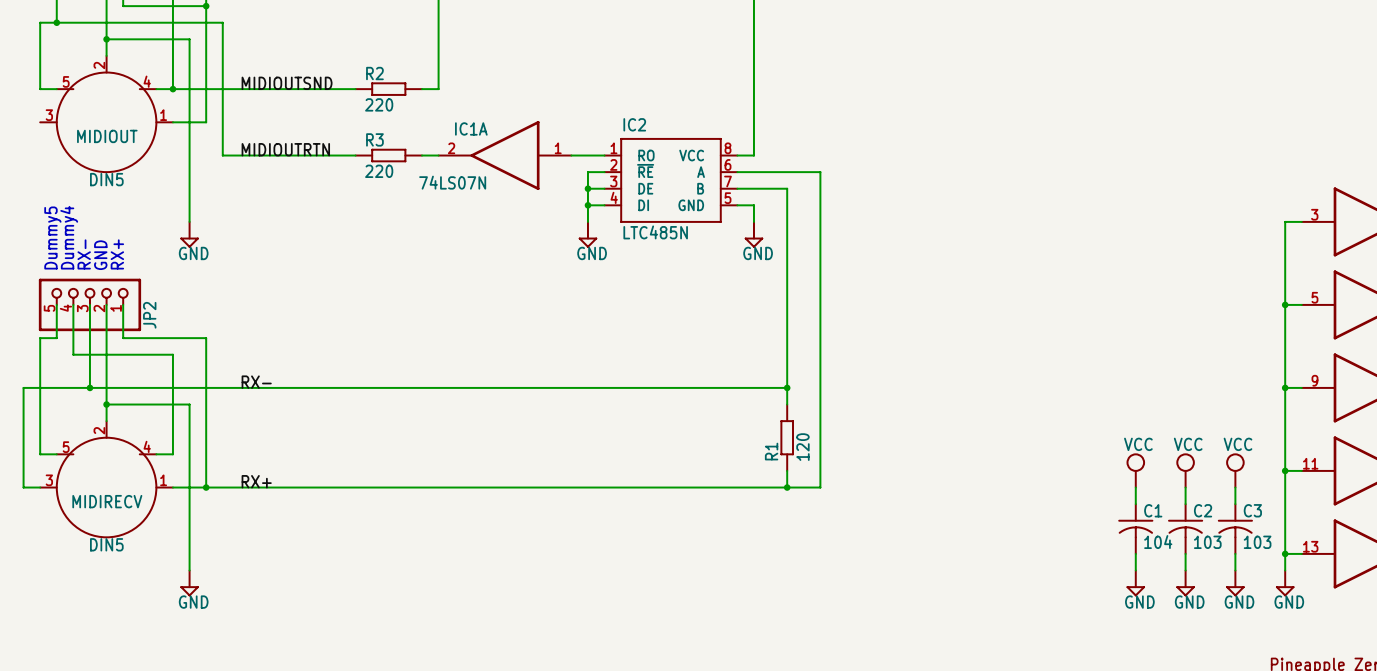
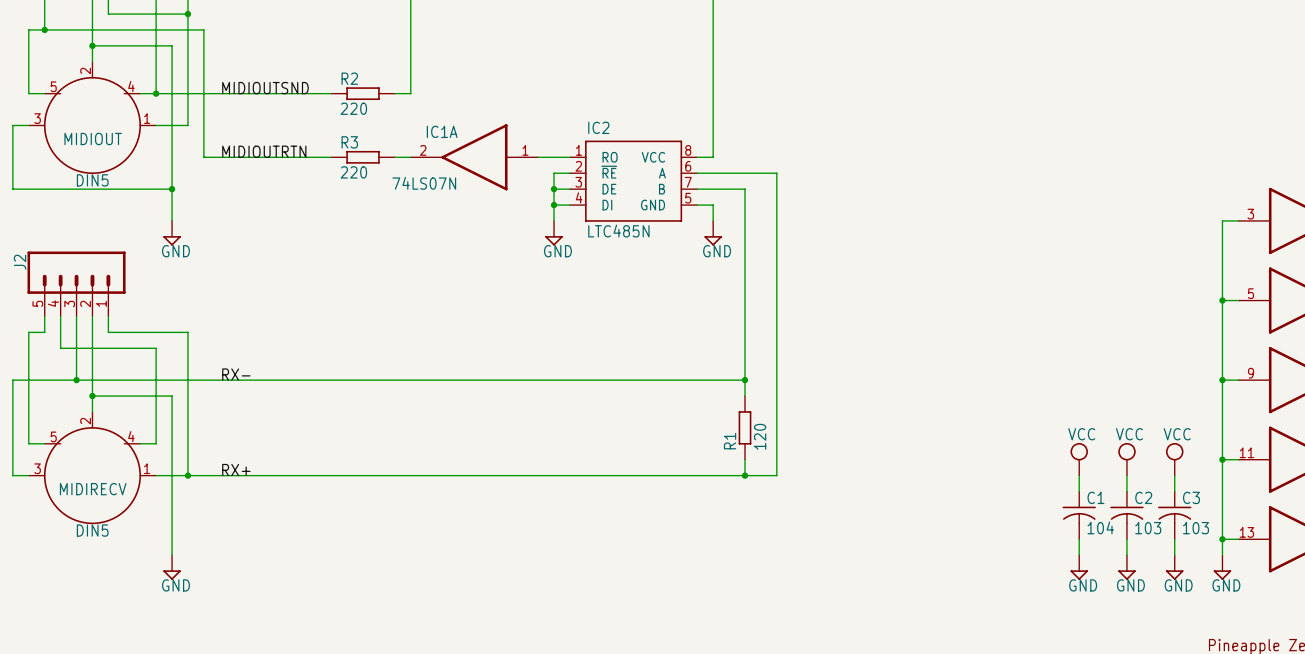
wire: none -> (28, 125) (12, 125) (12, 189) (172, 189)
junction: none -> (172, 189)
text: Dummy5 (52, 237) -> none
text: Dummy4 (69, 237) -> none
text: RX- (84, 254) -> none
text: RX+ (117, 254) -> none
text: GND (100, 255) -> none
J2: none -> (76, 283)
JP2: (89, 304) -> none

